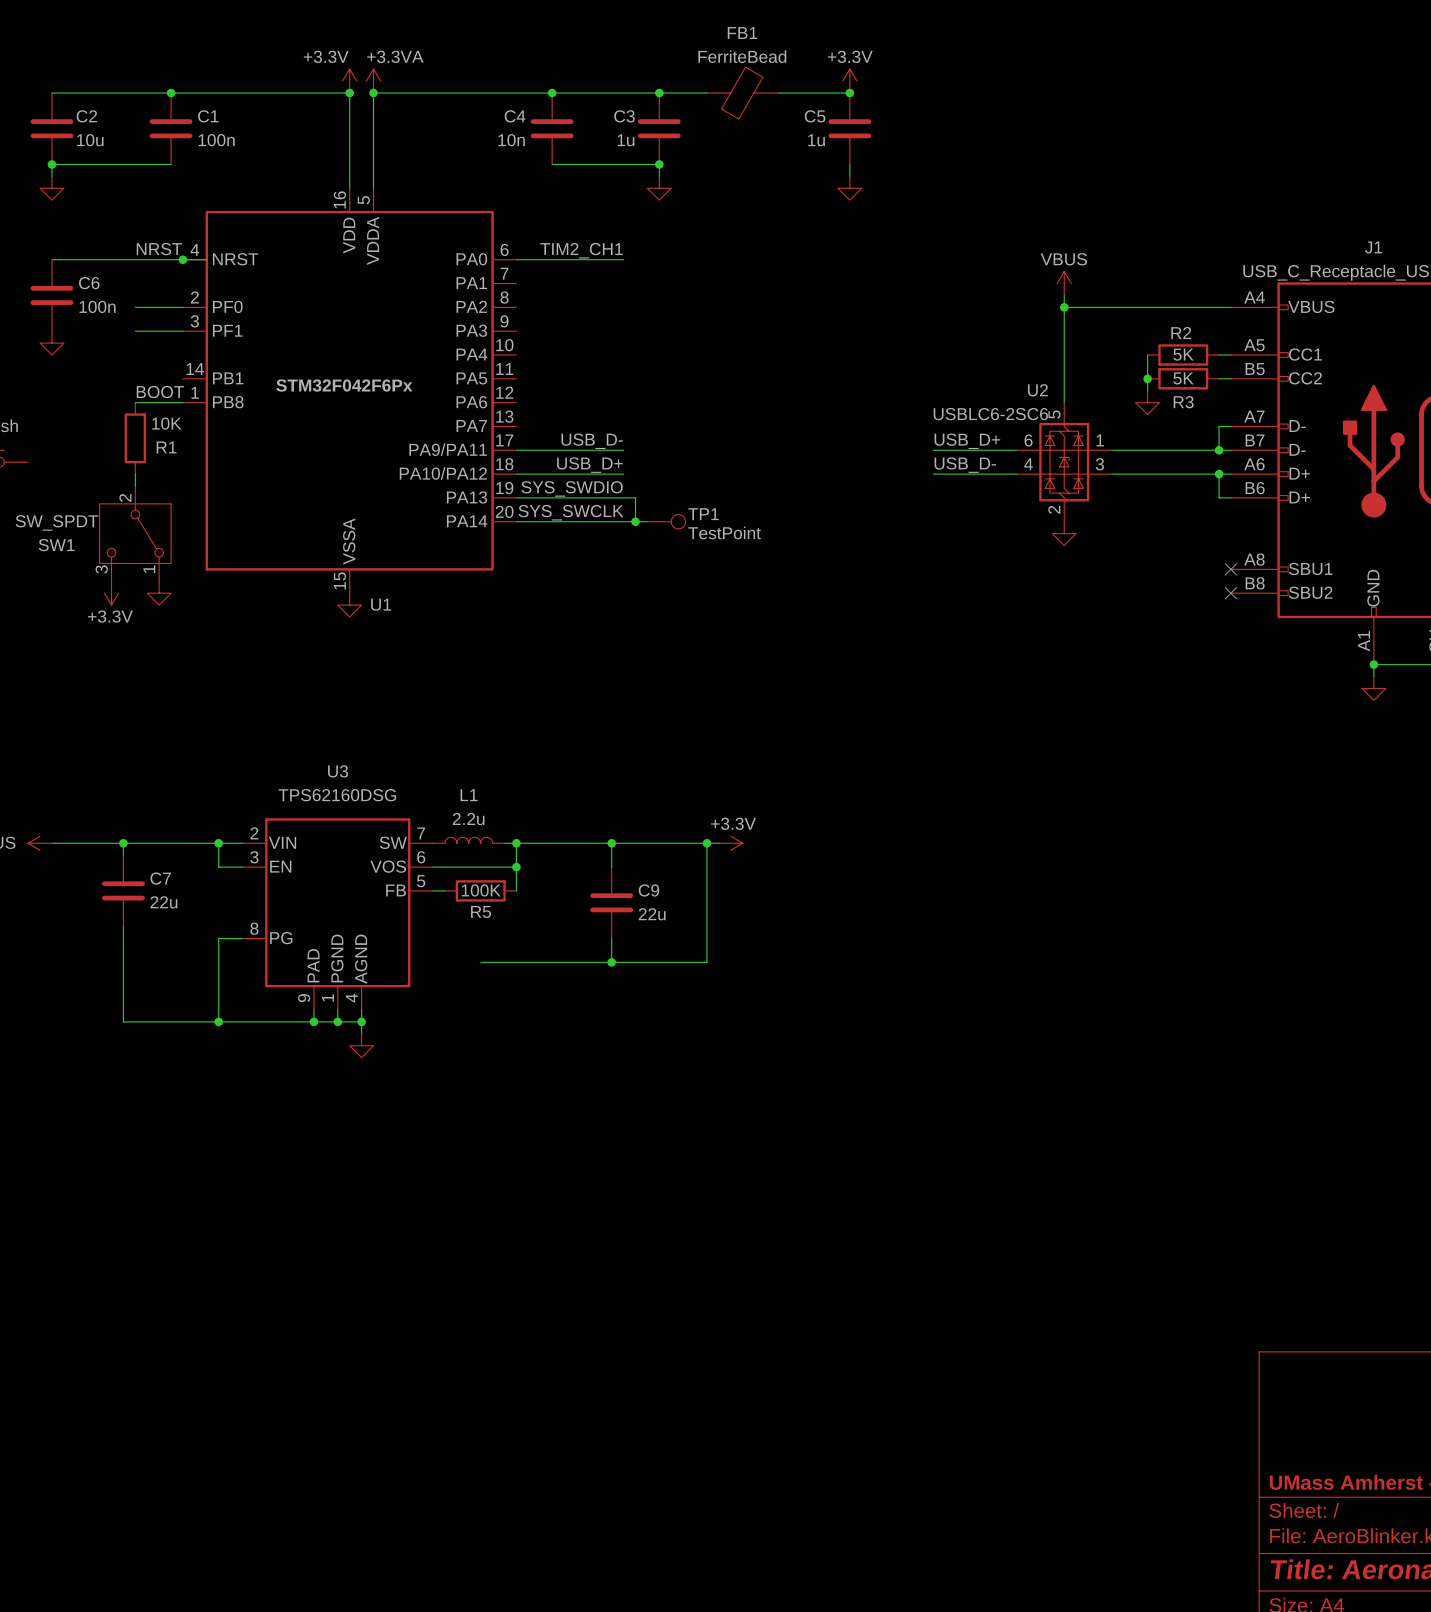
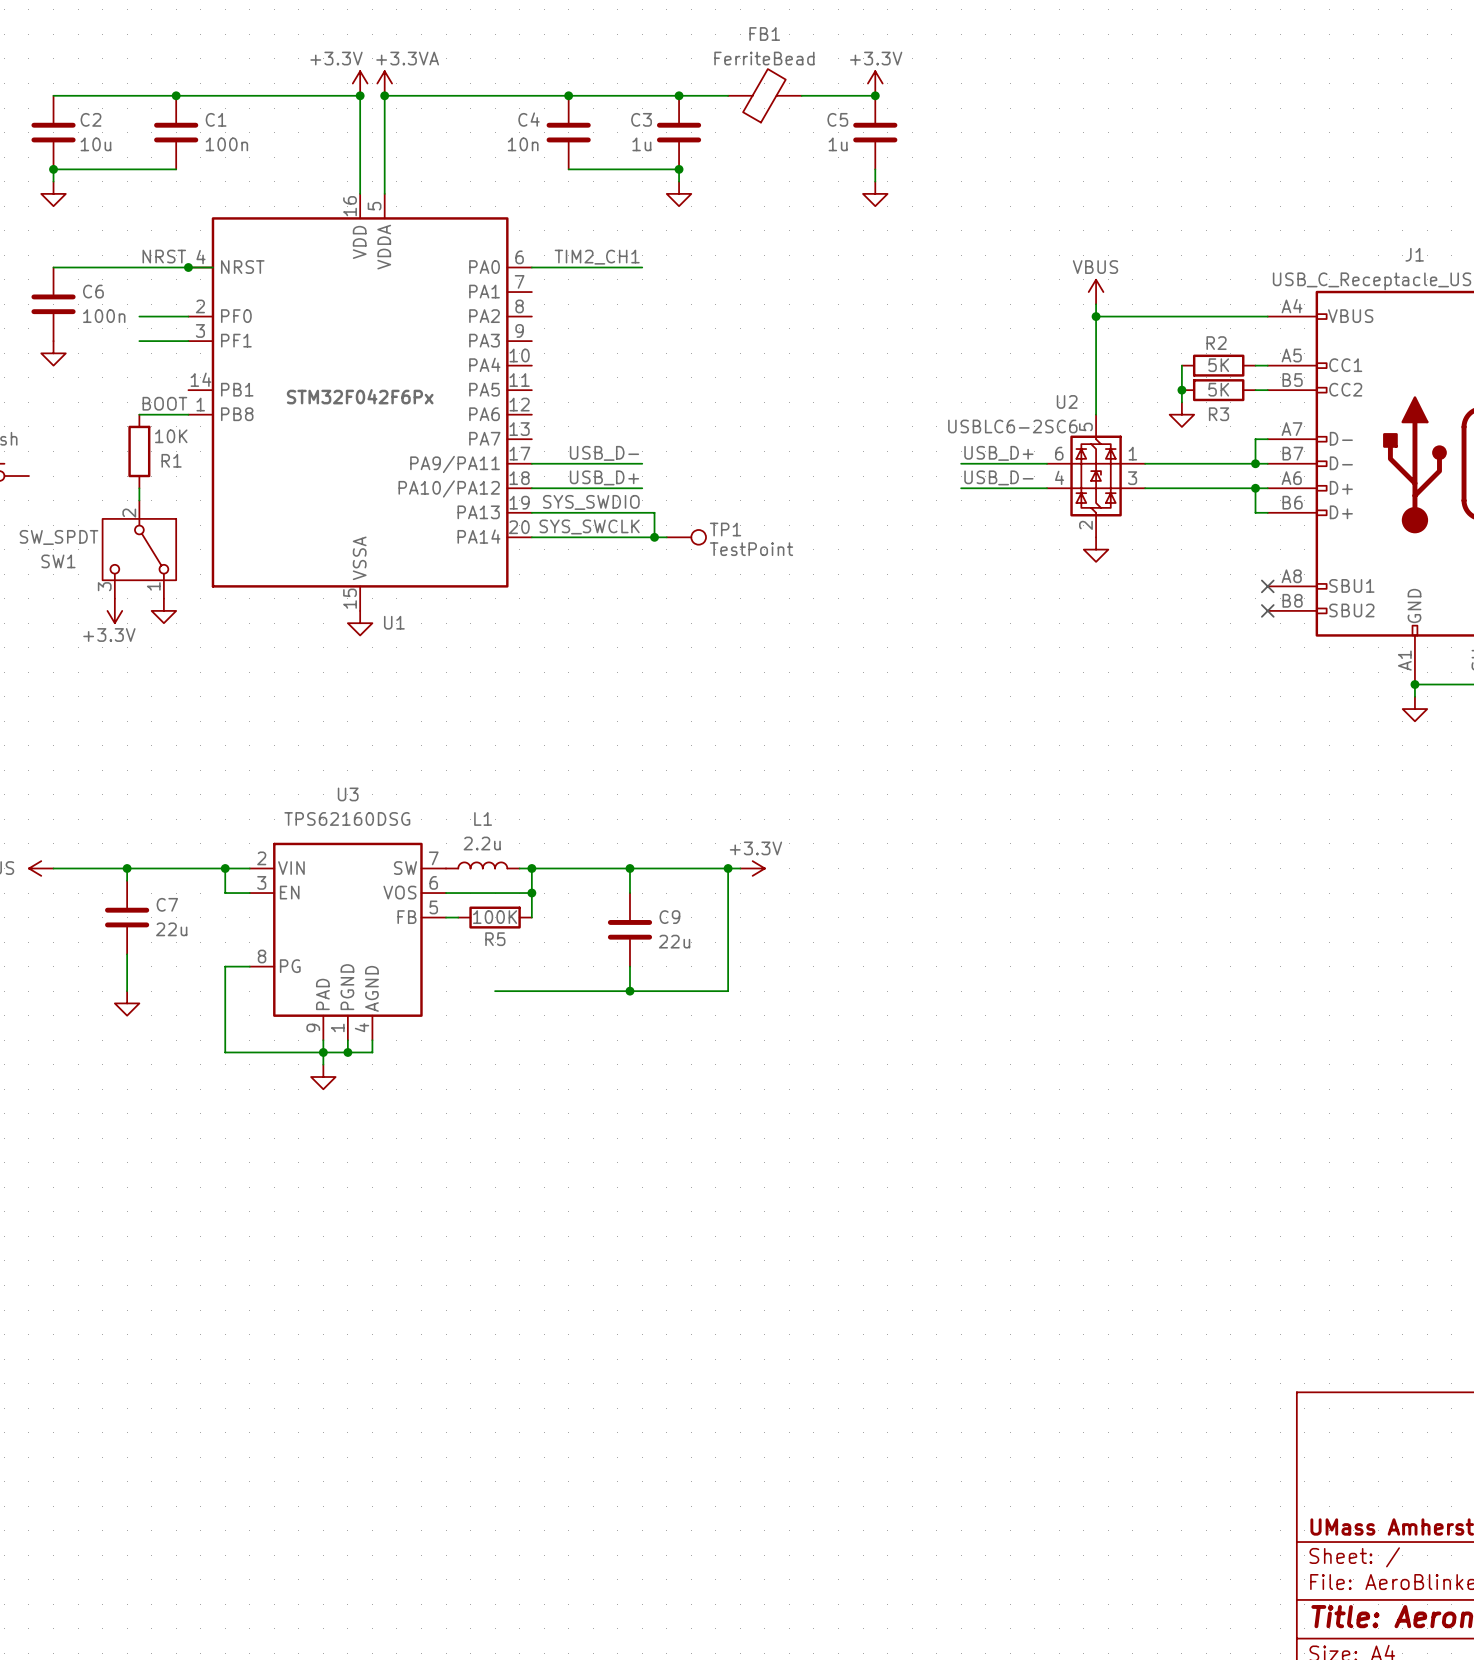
wire: (123, 962) (123, 1021) (218, 1021) -> none
power symbol: none -> (127, 1003)
junction: (218, 1021) -> none
wire: (361, 1021) (361, 1033) -> (323, 1052) (323, 1064)
junction: (361, 1021) -> none
power symbol position: (361, 1045) -> (323, 1077)

